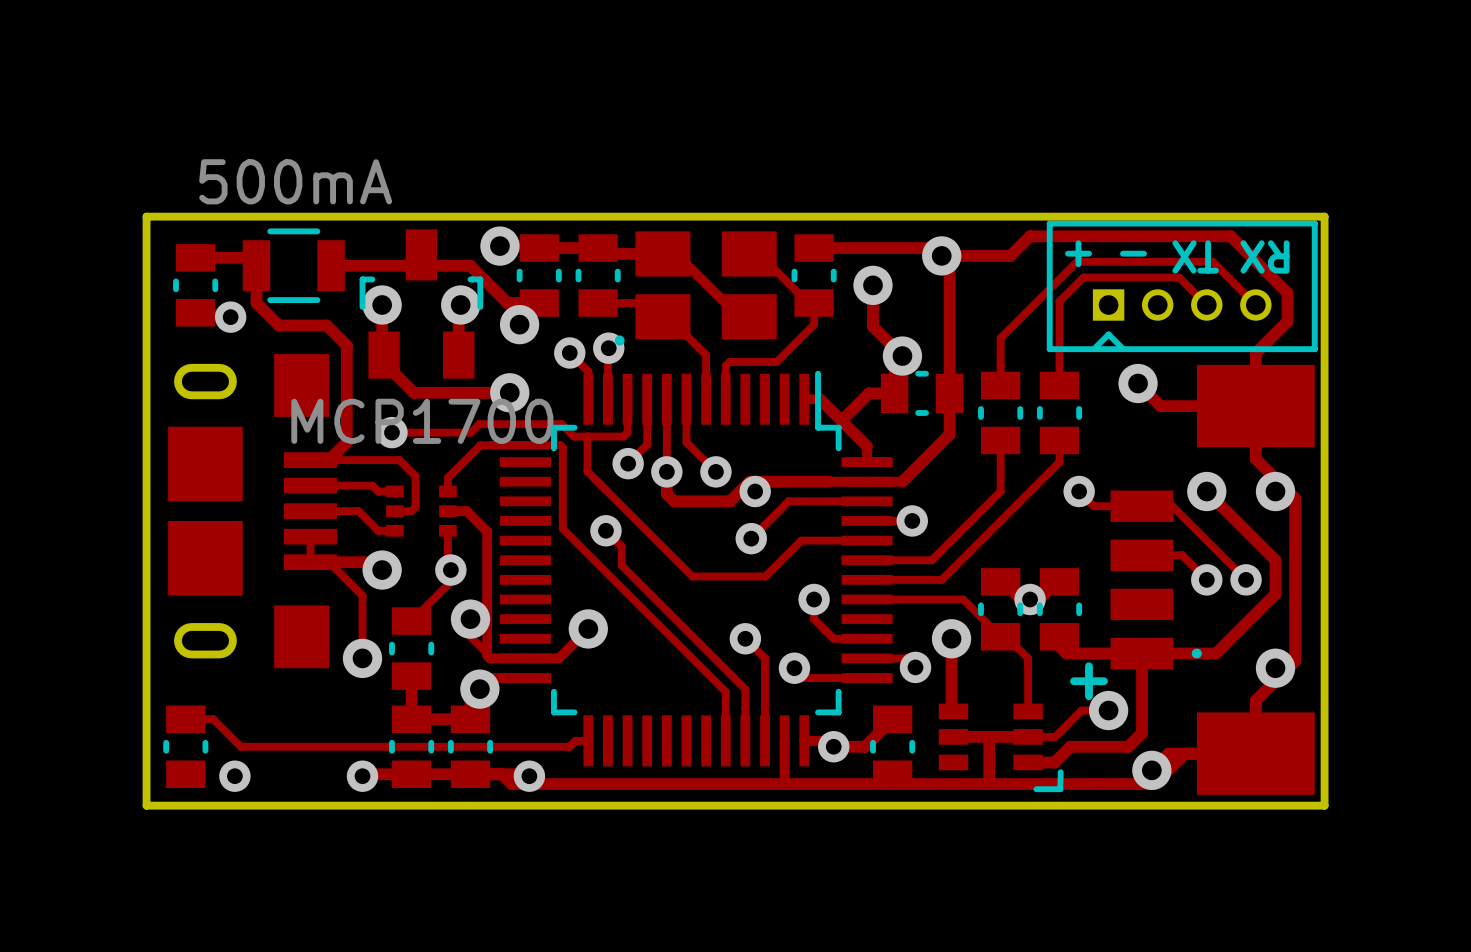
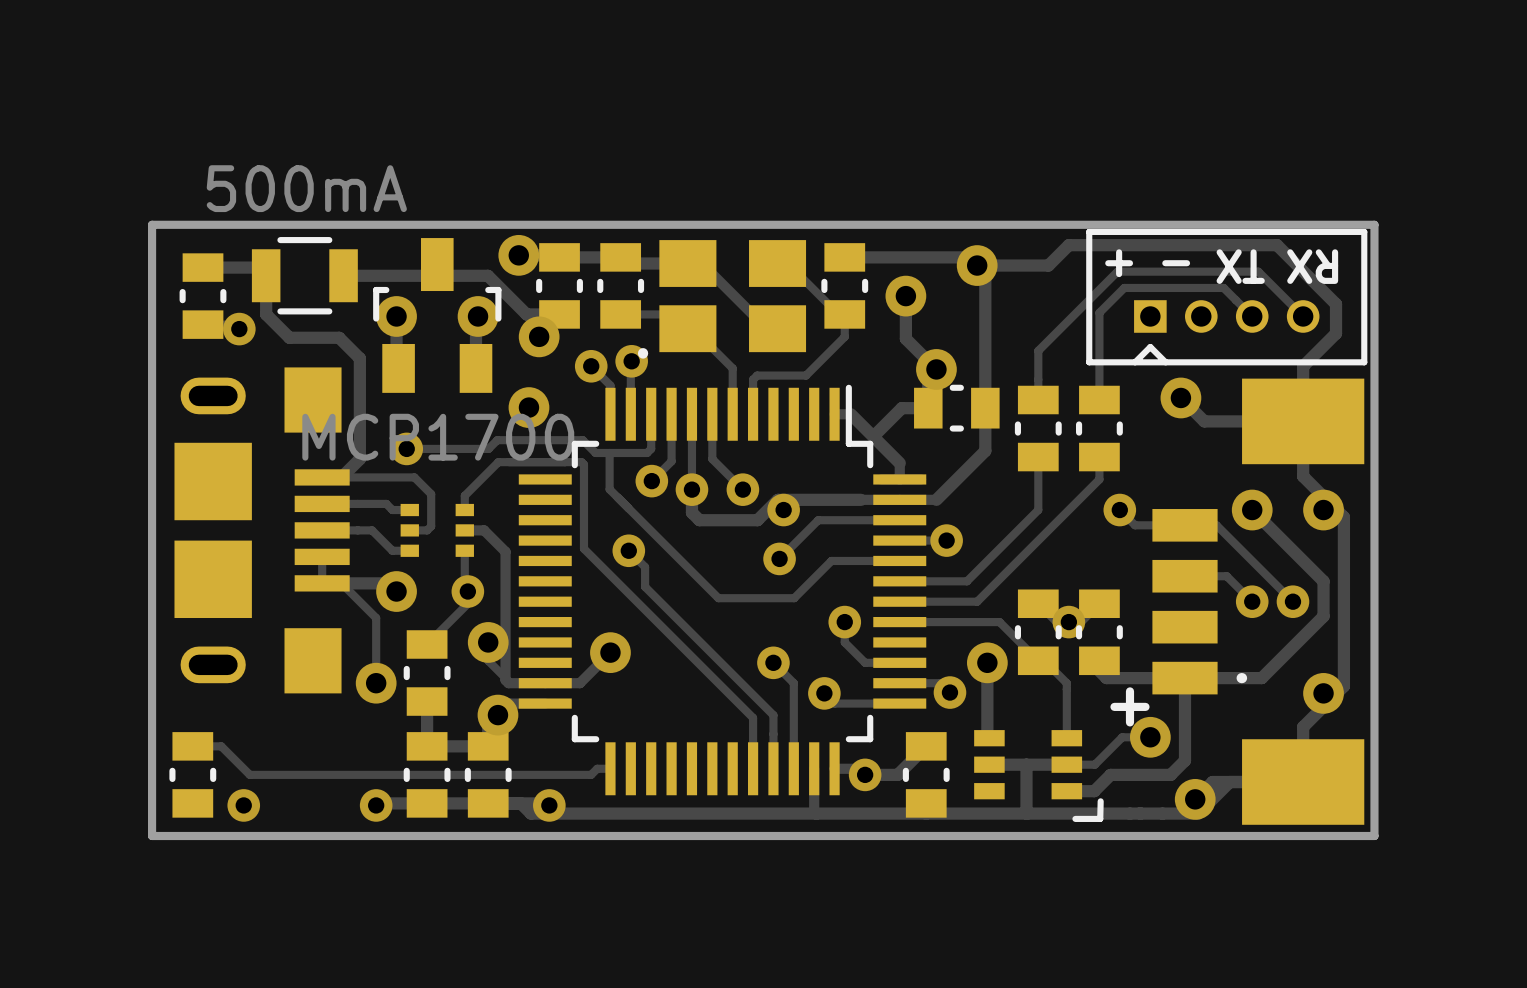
track: (384, 355) (384, 362) (413, 392) (509, 392) -> none

